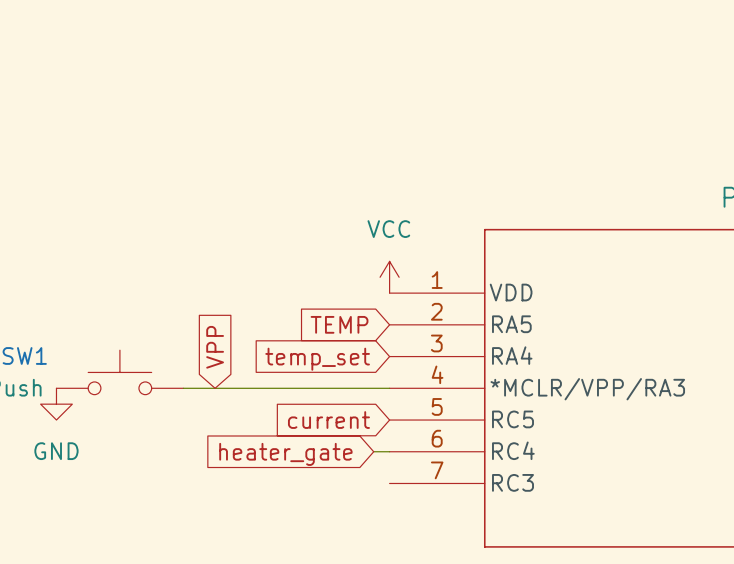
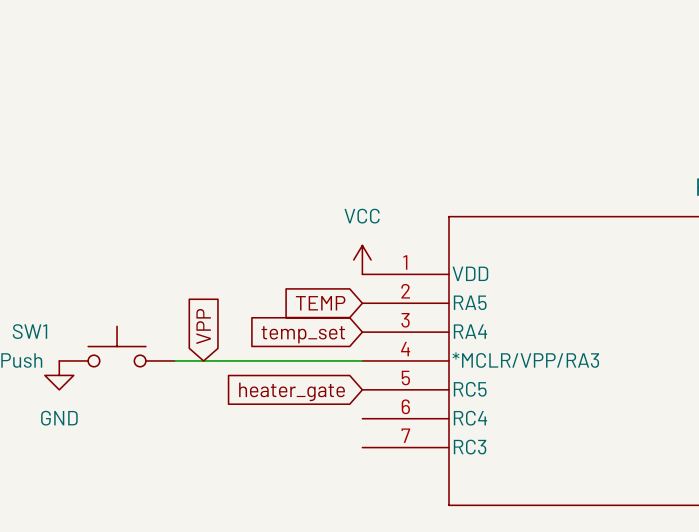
global label: current (328, 420) -> heater_gate (292, 391)
wire: (373, 451) (389, 451) -> none
global label: heater_gate (285, 454) -> none

